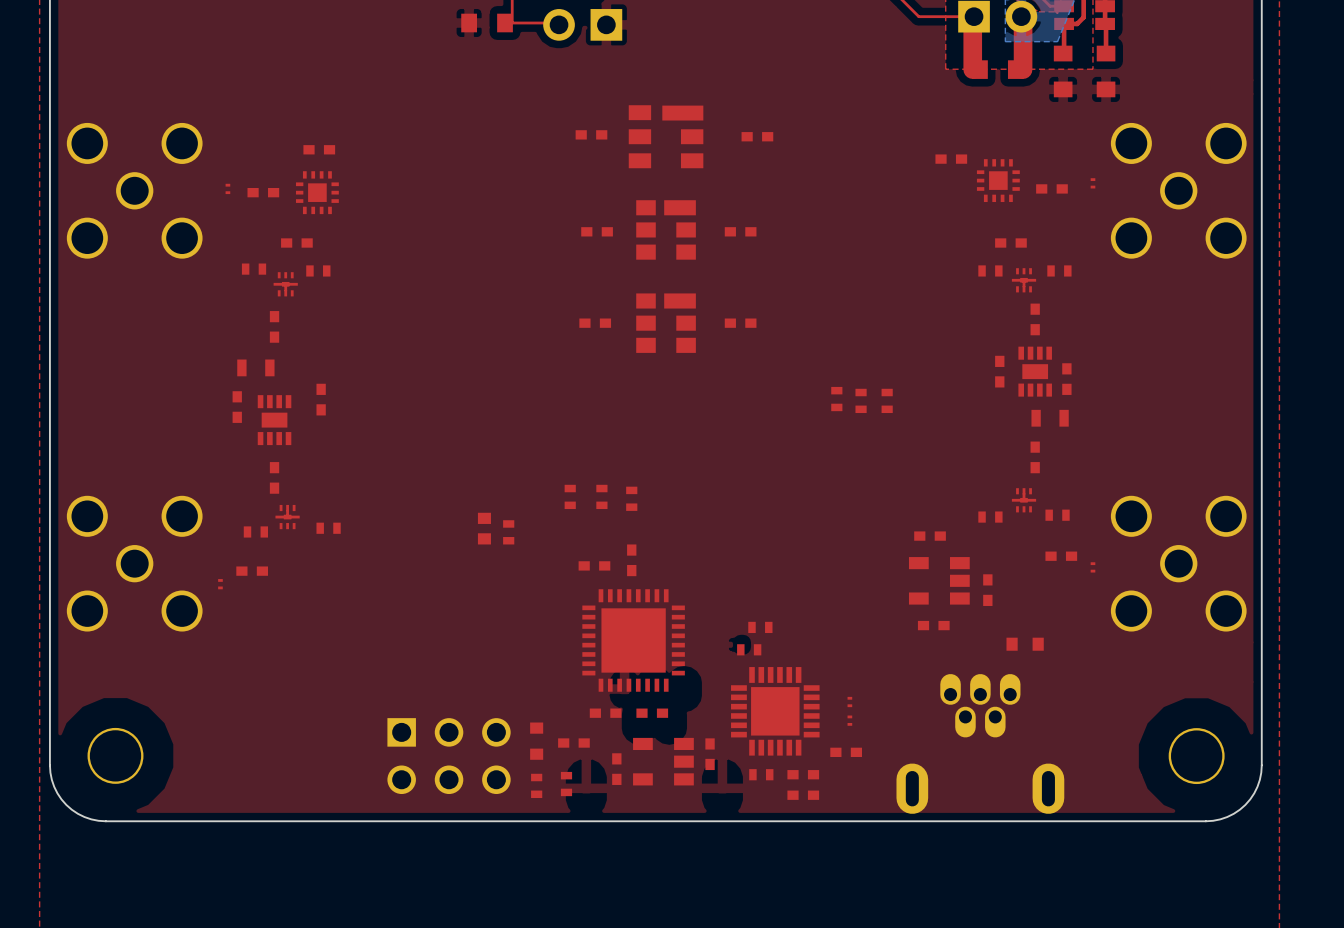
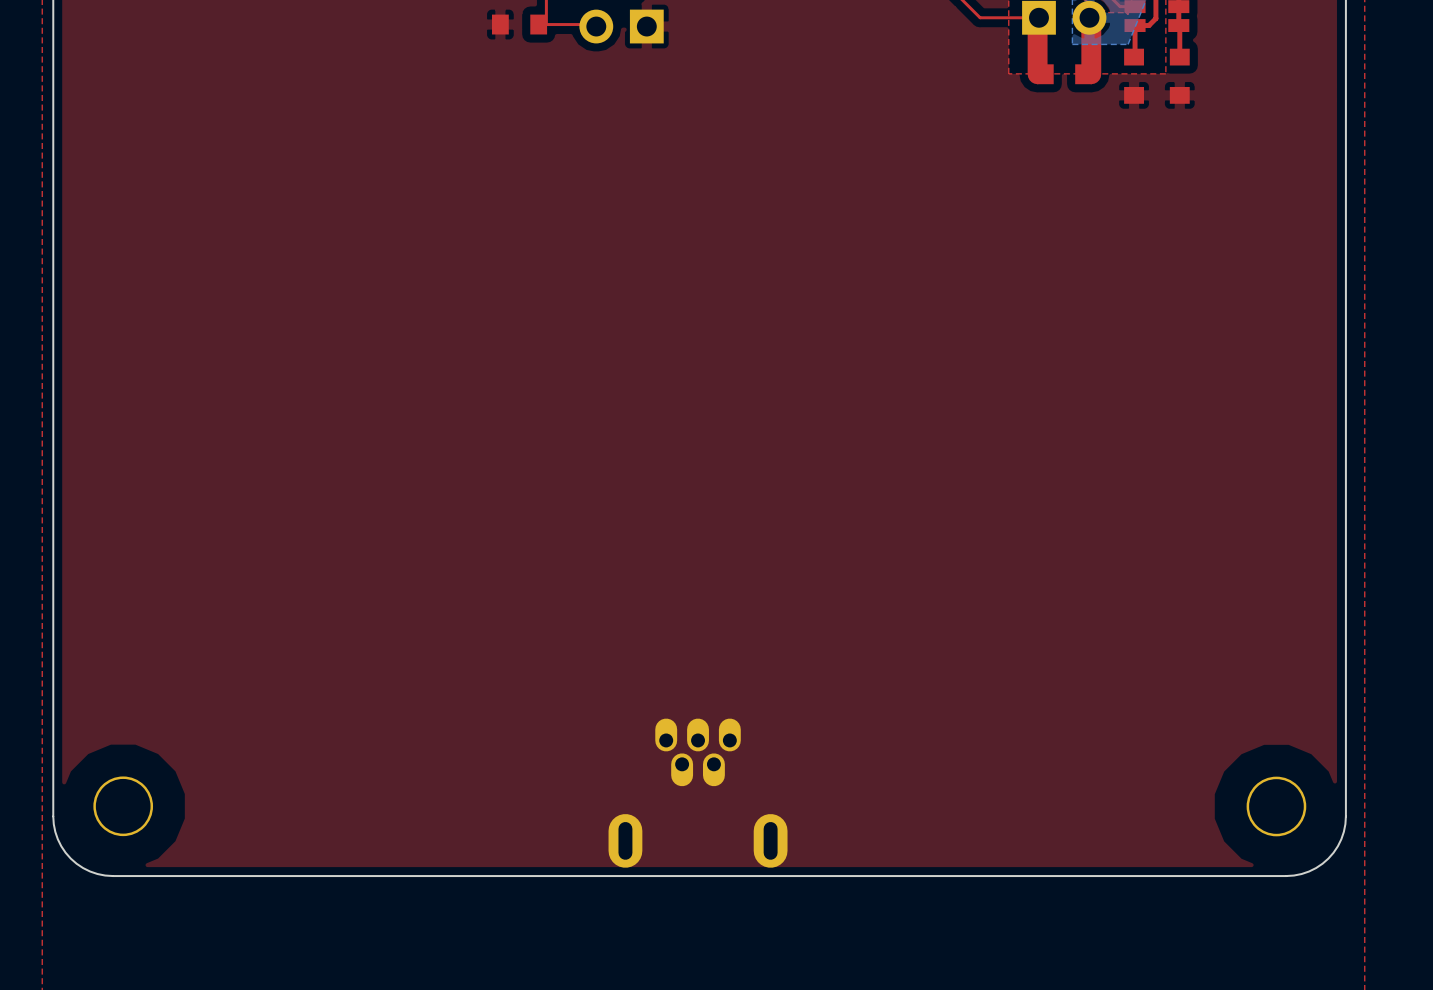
part: (591, 134) -> none
part: (666, 136) -> none
part: (757, 136) -> none
part: (319, 149) -> none
part: (951, 159) -> none
part: (998, 180) -> none
part: (1092, 183) -> none
part: (227, 188) -> none
part: (1051, 188) -> none
part: (134, 190) -> none
part: (1178, 190) -> none
part: (263, 192) -> none
part: (317, 192) -> none
part: (666, 229) -> none
part: (597, 231) -> none
part: (740, 231) -> none
part: (296, 243) -> none
part: (1010, 243) -> none
part: (254, 269) -> none
part: (318, 270) -> none
part: (990, 270) -> none
part: (1059, 270) -> none
part: (1024, 280) -> none
part: (285, 284) -> none
part: (1035, 319) -> none
part: (595, 323) -> none
part: (666, 323) -> none
part: (740, 323) -> none
part: (274, 326) -> none
part: (255, 367) -> none
part: (999, 371) -> none
part: (1035, 371) -> none
part: (1066, 379) -> none
part: (321, 399) -> none
part: (836, 399) -> none
part: (861, 400) -> none
part: (887, 400) -> none
part: (237, 407) -> none
part: (1050, 418) -> none
part: (274, 420) -> none
part: (1035, 457) -> none
part: (274, 477) -> none
part: (570, 496) -> none
part: (601, 496) -> none
part: (631, 498) -> none
part: (1024, 500) -> none
part: (1057, 515) -> none
part: (287, 517) -> none
part: (990, 517) -> none
part: (328, 528) -> none
part: (484, 528) -> none
part: (255, 531) -> none
part: (508, 532) -> none
part: (930, 536) -> none
part: (1061, 556) -> none
part: (631, 560) -> none
part: (134, 563) -> none
part: (1178, 563) -> none
part: (594, 565) -> none
part: (1092, 567) -> none
part: (252, 571) -> none
part: (939, 580) -> none
part: (220, 584) -> none
part: (987, 590) -> none
part: (933, 625) -> none
part: (760, 627) -> none
part: (633, 640) -> none
part: (1025, 644) -> none
part: (749, 649) -> none
part: (849, 702) -> none
part: (775, 711) -> none
part: (605, 713) -> none
part: (652, 713) -> none
part: (849, 720) -> none
part: (536, 741) -> none
part: (573, 743) -> none
part position: (980, 743) -> (698, 793)
part: (846, 752) -> none
part: (710, 754) -> none
part: (449, 756) -> none
part: (663, 761) -> none
part: (616, 769) -> none
part: (761, 774) -> none
part: (803, 774) -> none
part: (566, 784) -> none
part: (536, 785) -> none
part: (803, 795) -> none

